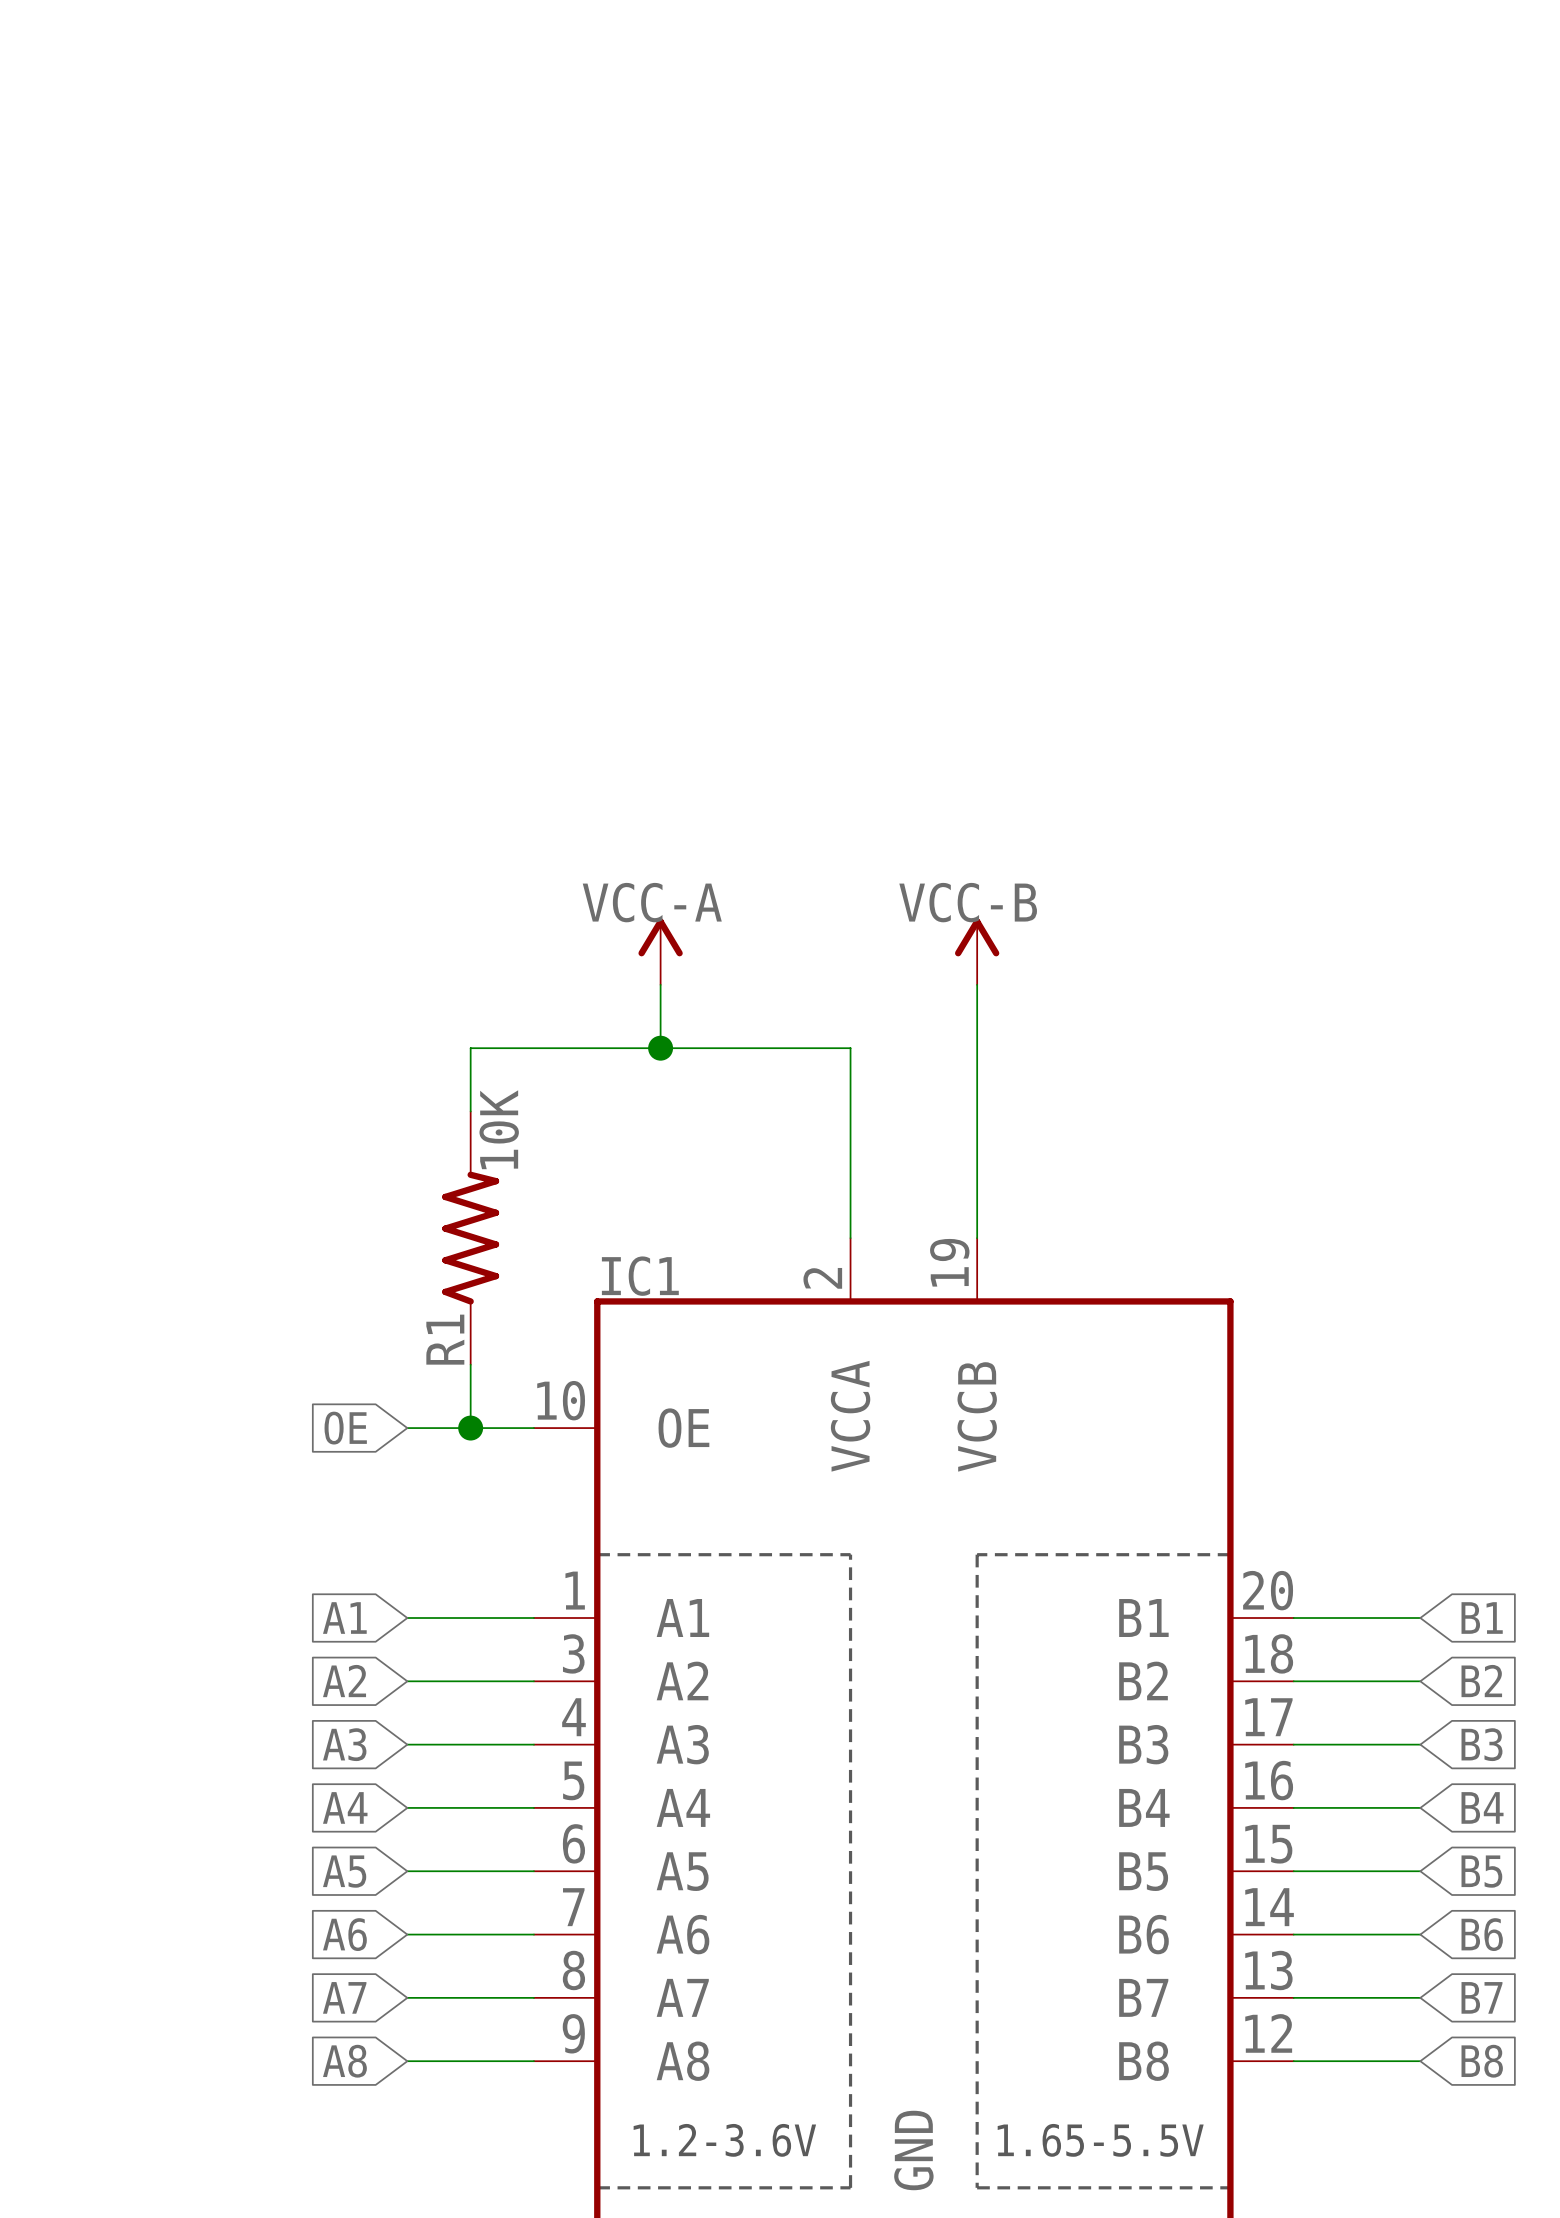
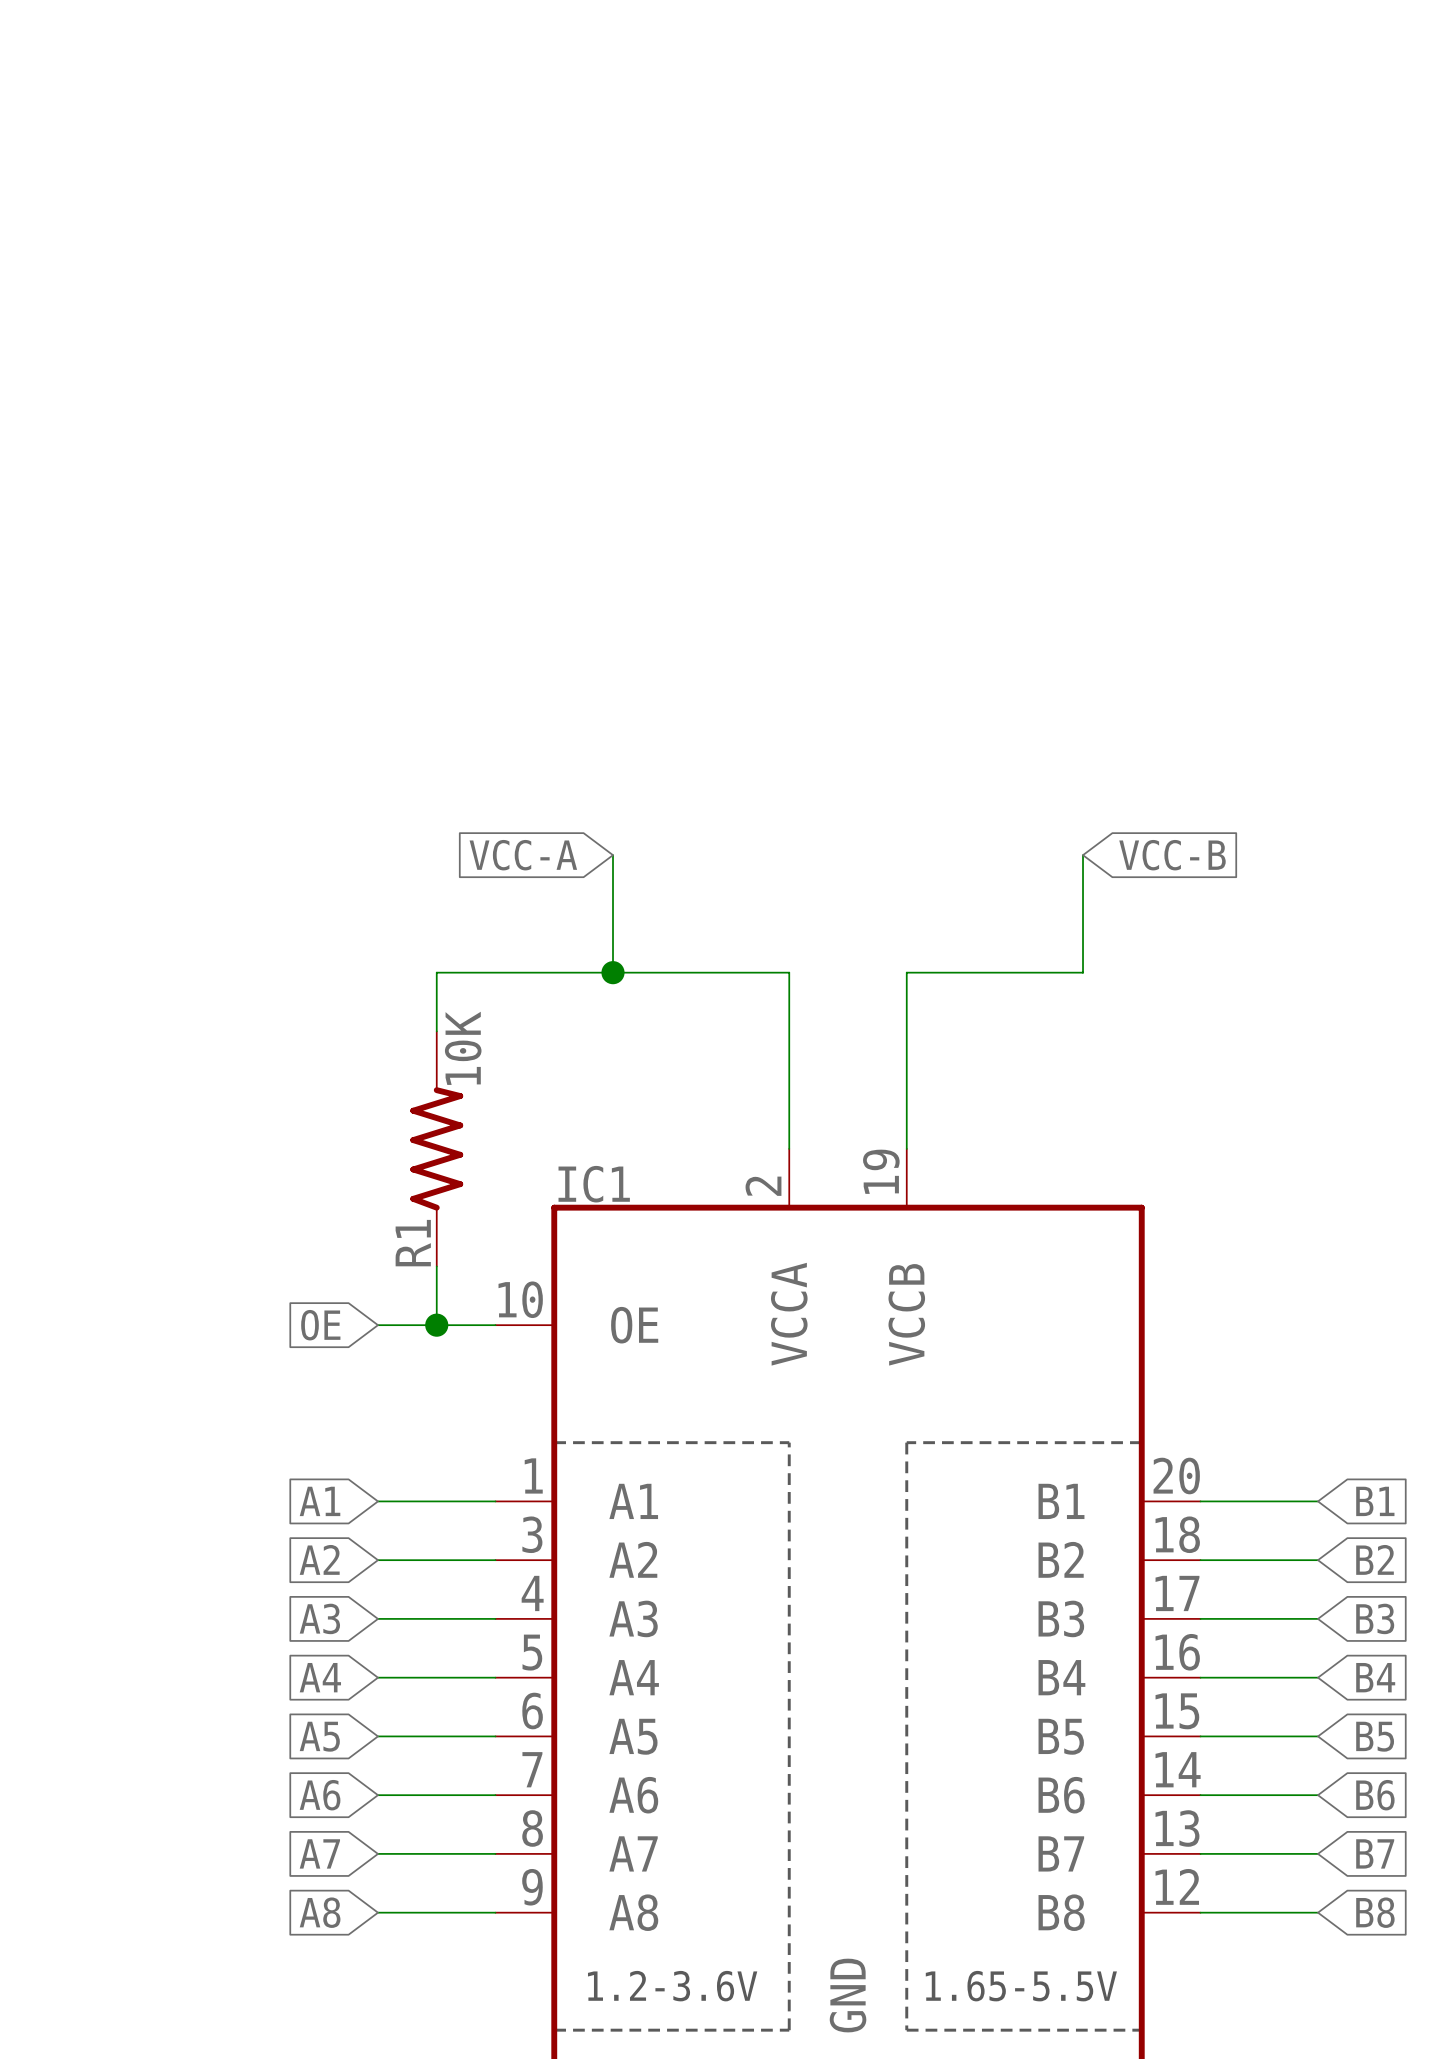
global label: none -> VCC-A (523, 855)
global label: none -> VCC-B (1172, 855)
power symbol: (660, 951) -> none
power symbol: (977, 951) -> none
wire: (977, 984) (977, 1048) -> (1083, 855) (1083, 972) (906, 972)

